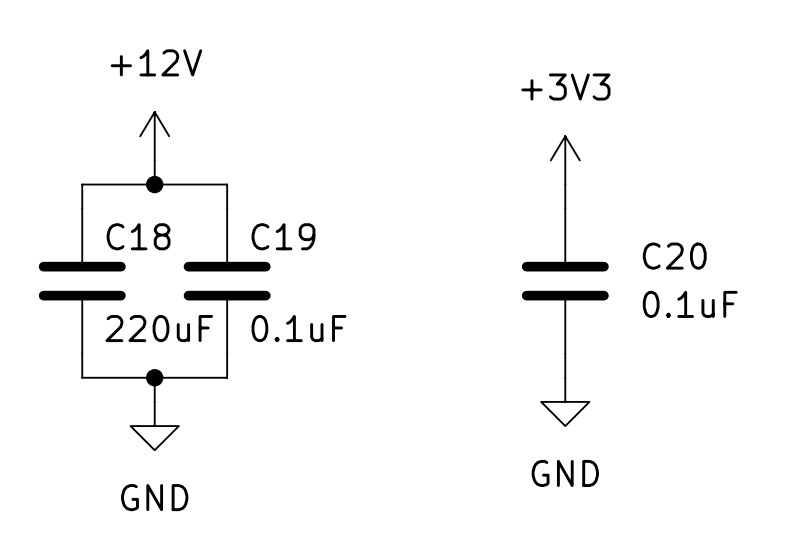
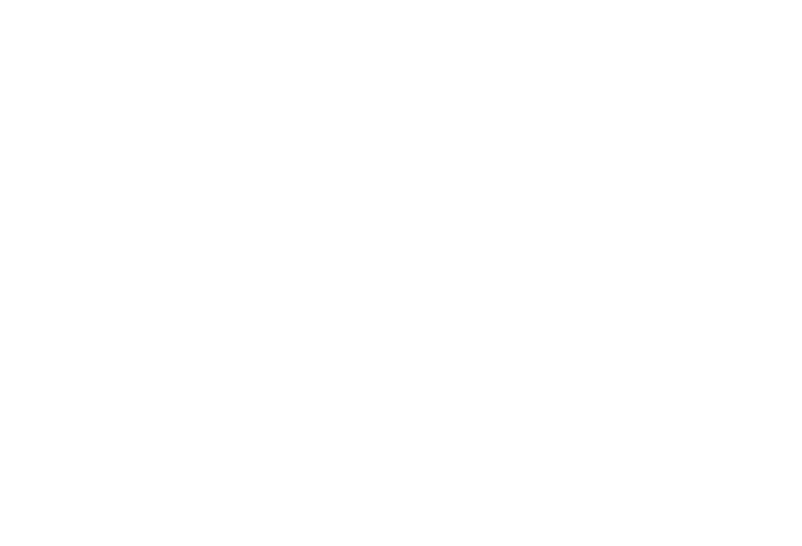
power symbol: +12V (154, 136) -> none
wire: (154, 160) (154, 184) -> none
power symbol: +3V3 (565, 160) -> none
junction: (154, 184) -> none
wire: (565, 184) (565, 208) -> none
wire: (82, 208) (82, 184) (227, 184) (227, 208) -> none
C18: 220uF (82, 281) -> none
C19: 0.1uF (227, 281) -> none
C20: 0.1uF (565, 281) -> none
wire: (82, 353) (82, 377) (227, 377) (227, 353) -> none
wire: (565, 353) (565, 377) -> none
wire: (154, 377) (154, 401) -> none
junction: (154, 377) -> none
power symbol: GND (565, 401) -> none
power symbol: GND (154, 426) -> none

